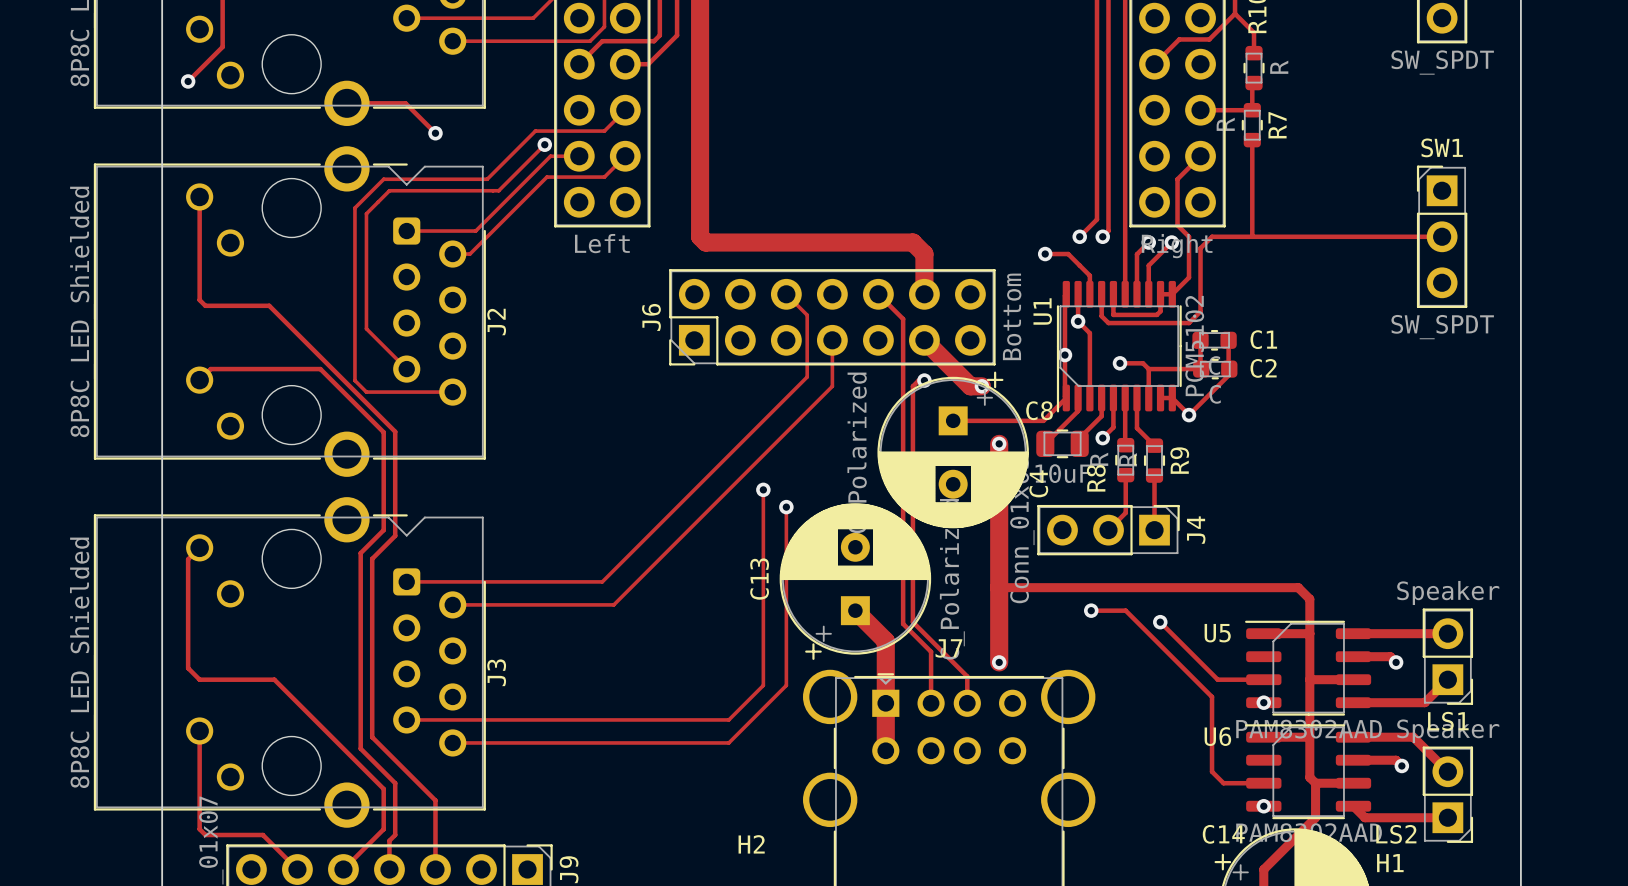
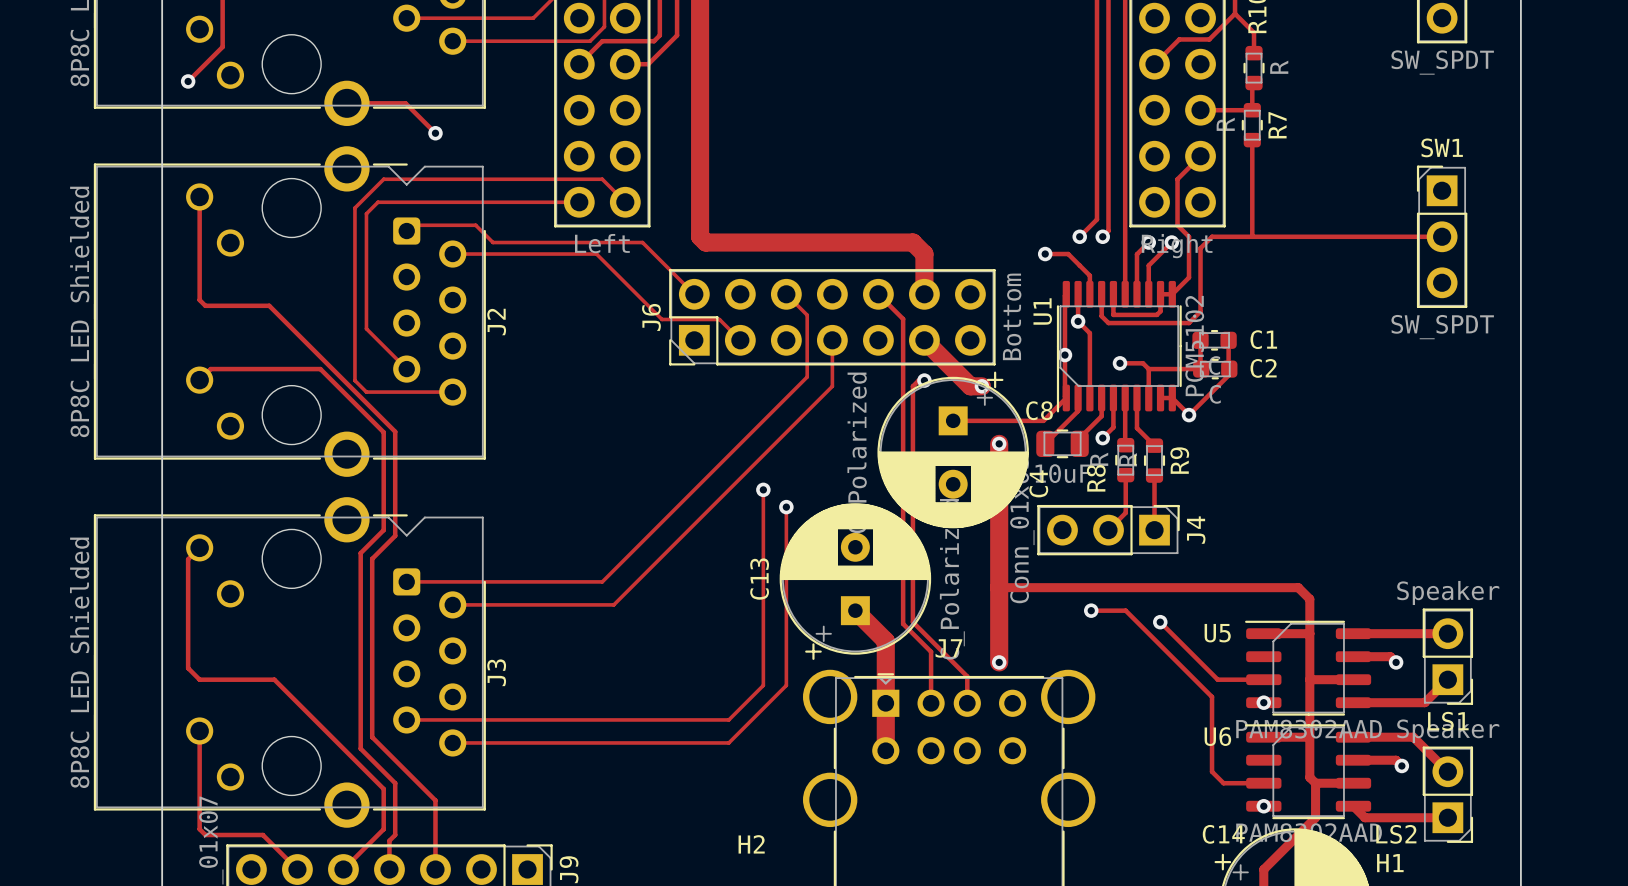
track: (625, 110) (604, 131) (535, 131) (487, 179) -> (625, 202) (602, 179) (487, 179)
track: (544, 144) (498, 190) (389, 190) (377, 202) -> (579, 202) (377, 202)
via: (544, 144) -> none
track: (579, 156) (550, 156) (475, 231) (406, 231) -> none
track: (625, 156) (604, 177) (546, 177) (470, 254) -> (740, 340) (719, 319) (661, 319) (596, 254) (470, 254)
track: none -> (412, 225) (475, 225) (493, 242) (642, 242) (694, 294)

